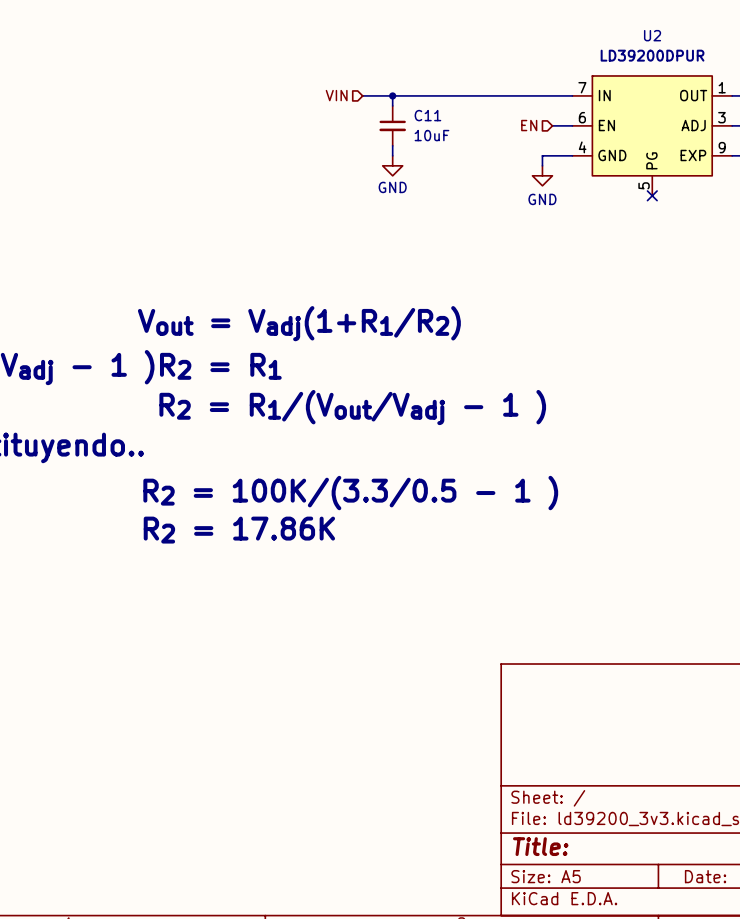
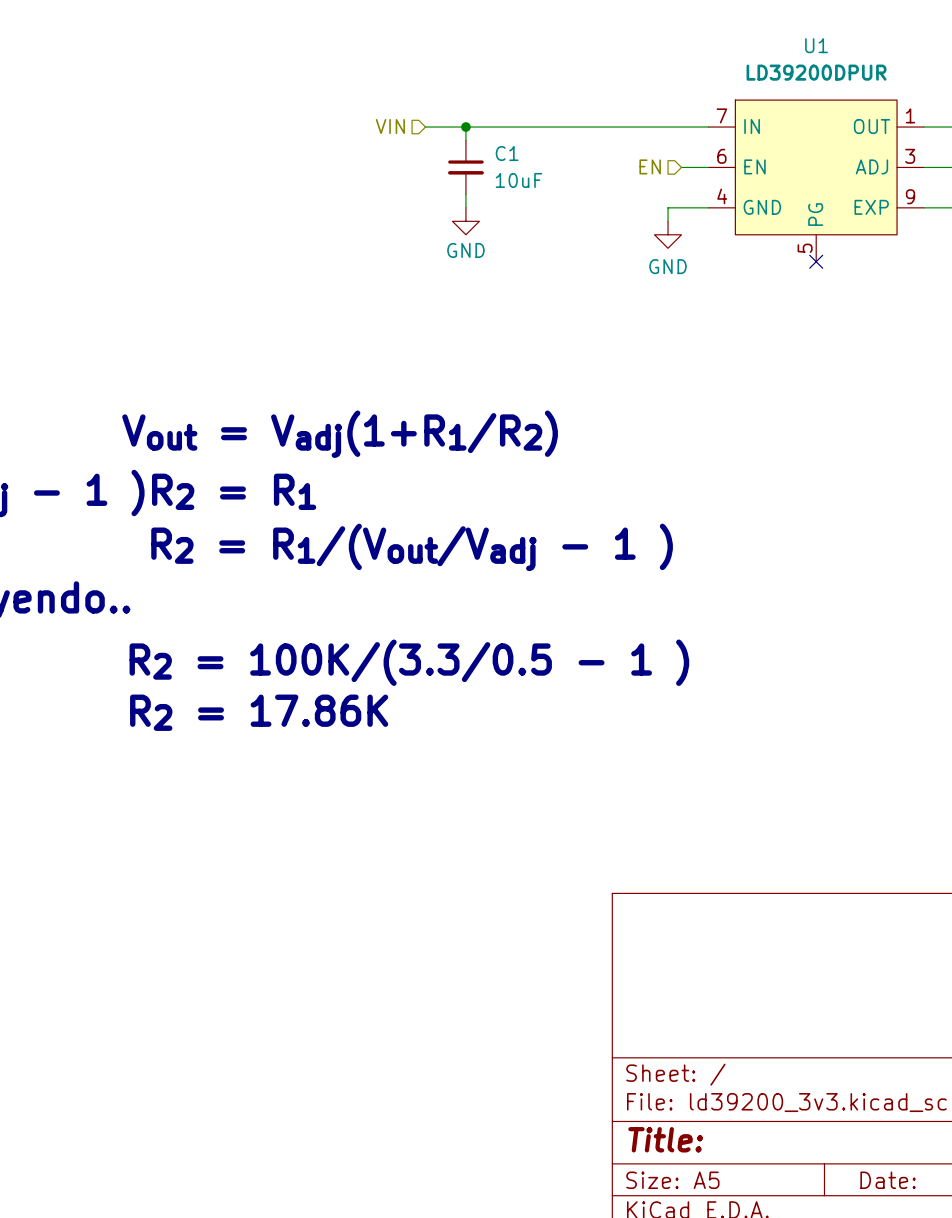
U2 name: U2 (652, 35) -> U1 (816, 45)
C11 name: C11 (427, 115) -> C1 (507, 153)

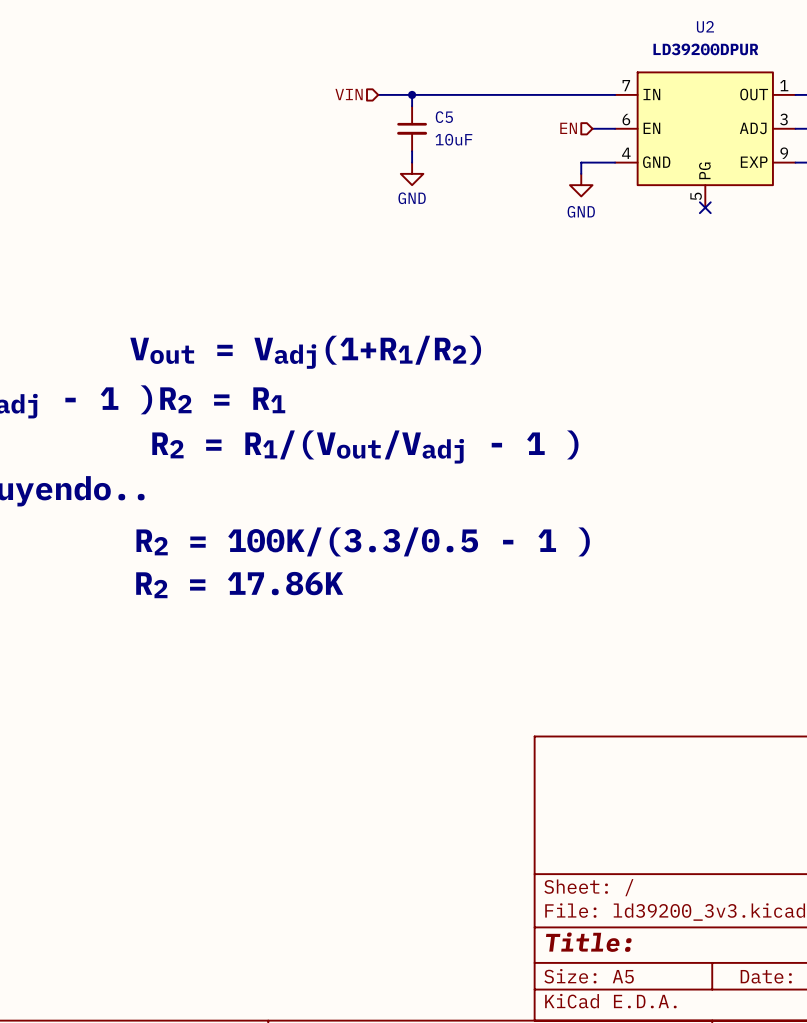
U1 name: U1 (816, 45) -> U2 (705, 26)
C1 name: C1 (507, 153) -> C5 (444, 117)

